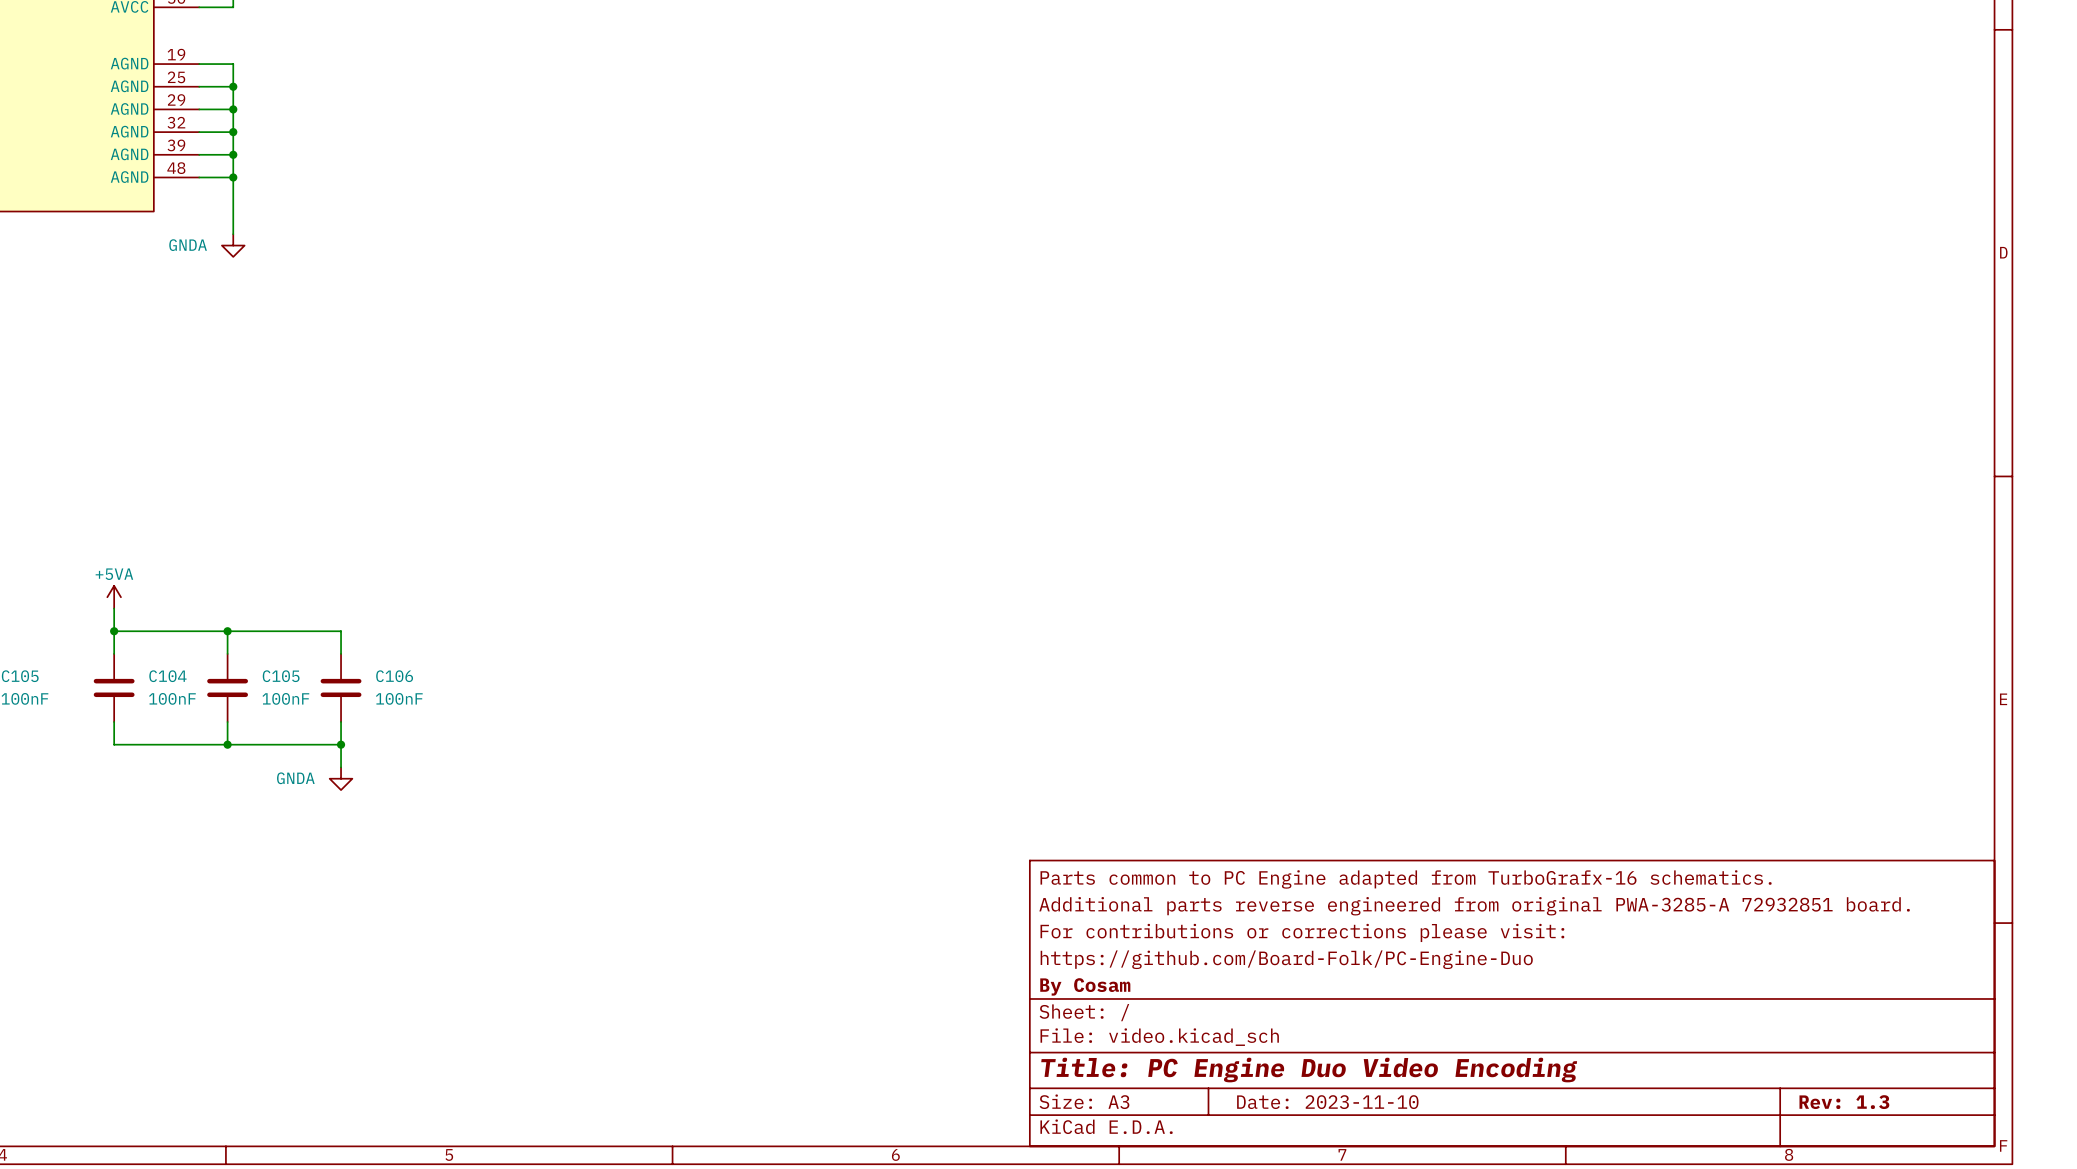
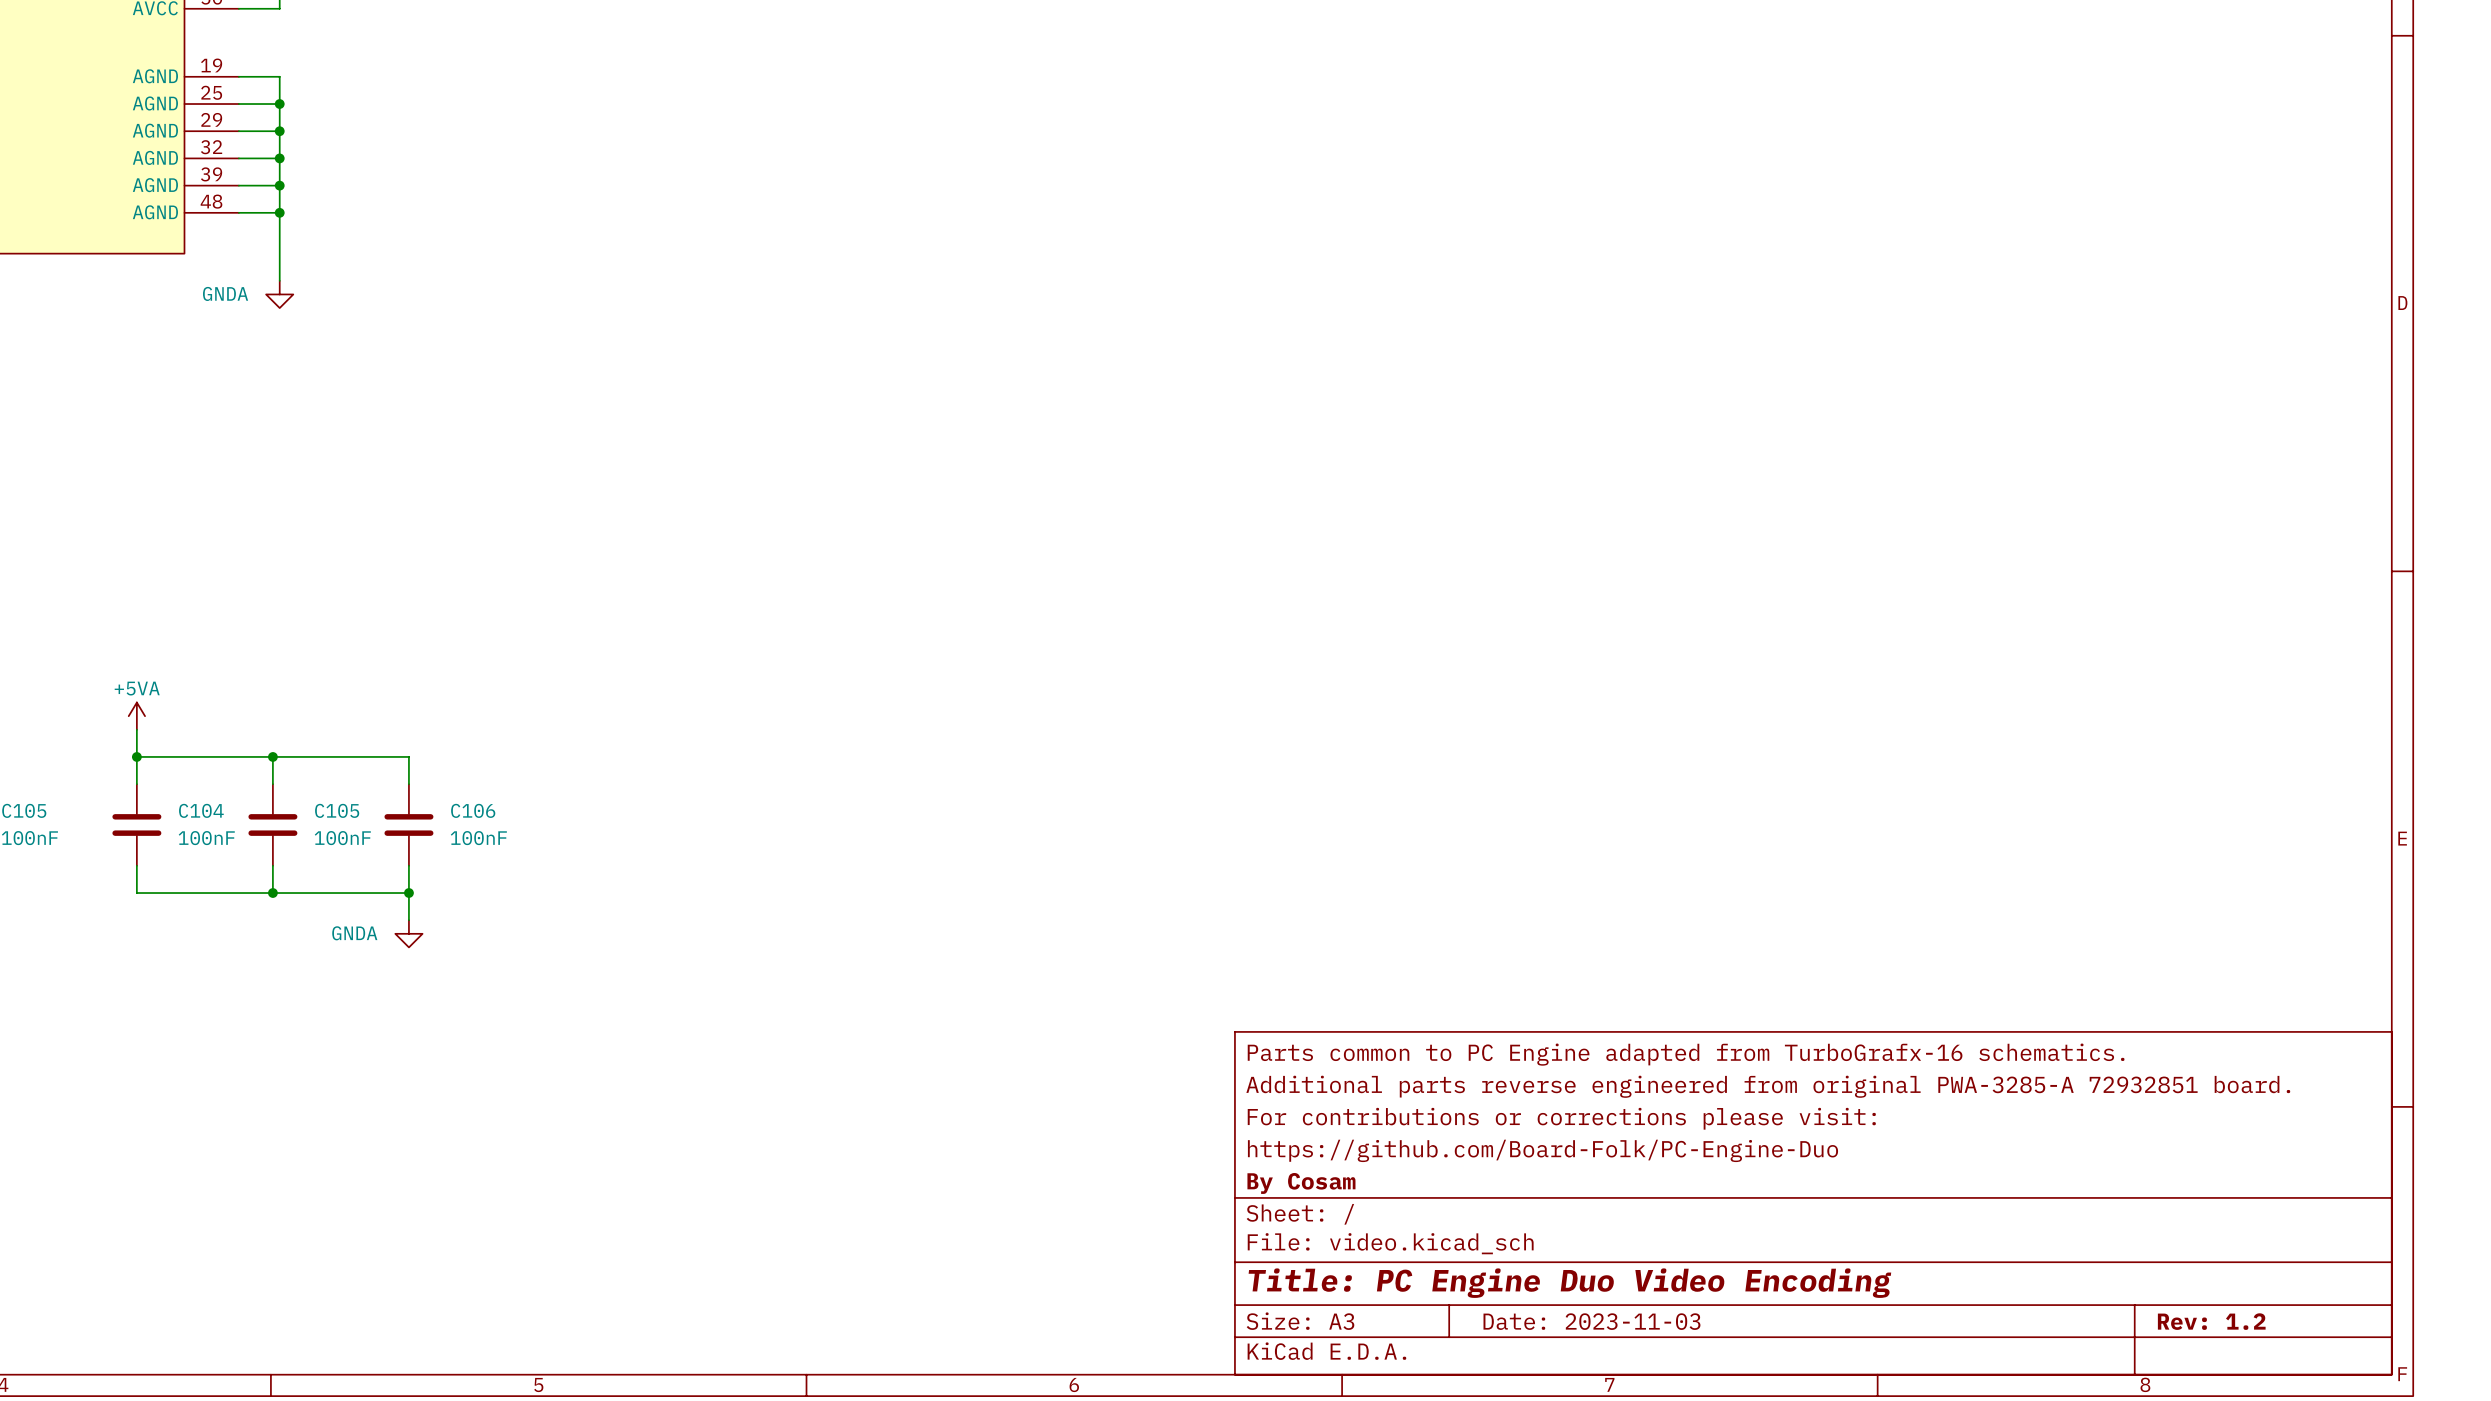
title block: Date: 2023-11-10 (1327, 1102) -> Date: 2023-11-03 (1591, 1321)
title block: Rev: 1.3 (1844, 1102) -> Rev: 1.2 (2211, 1321)

